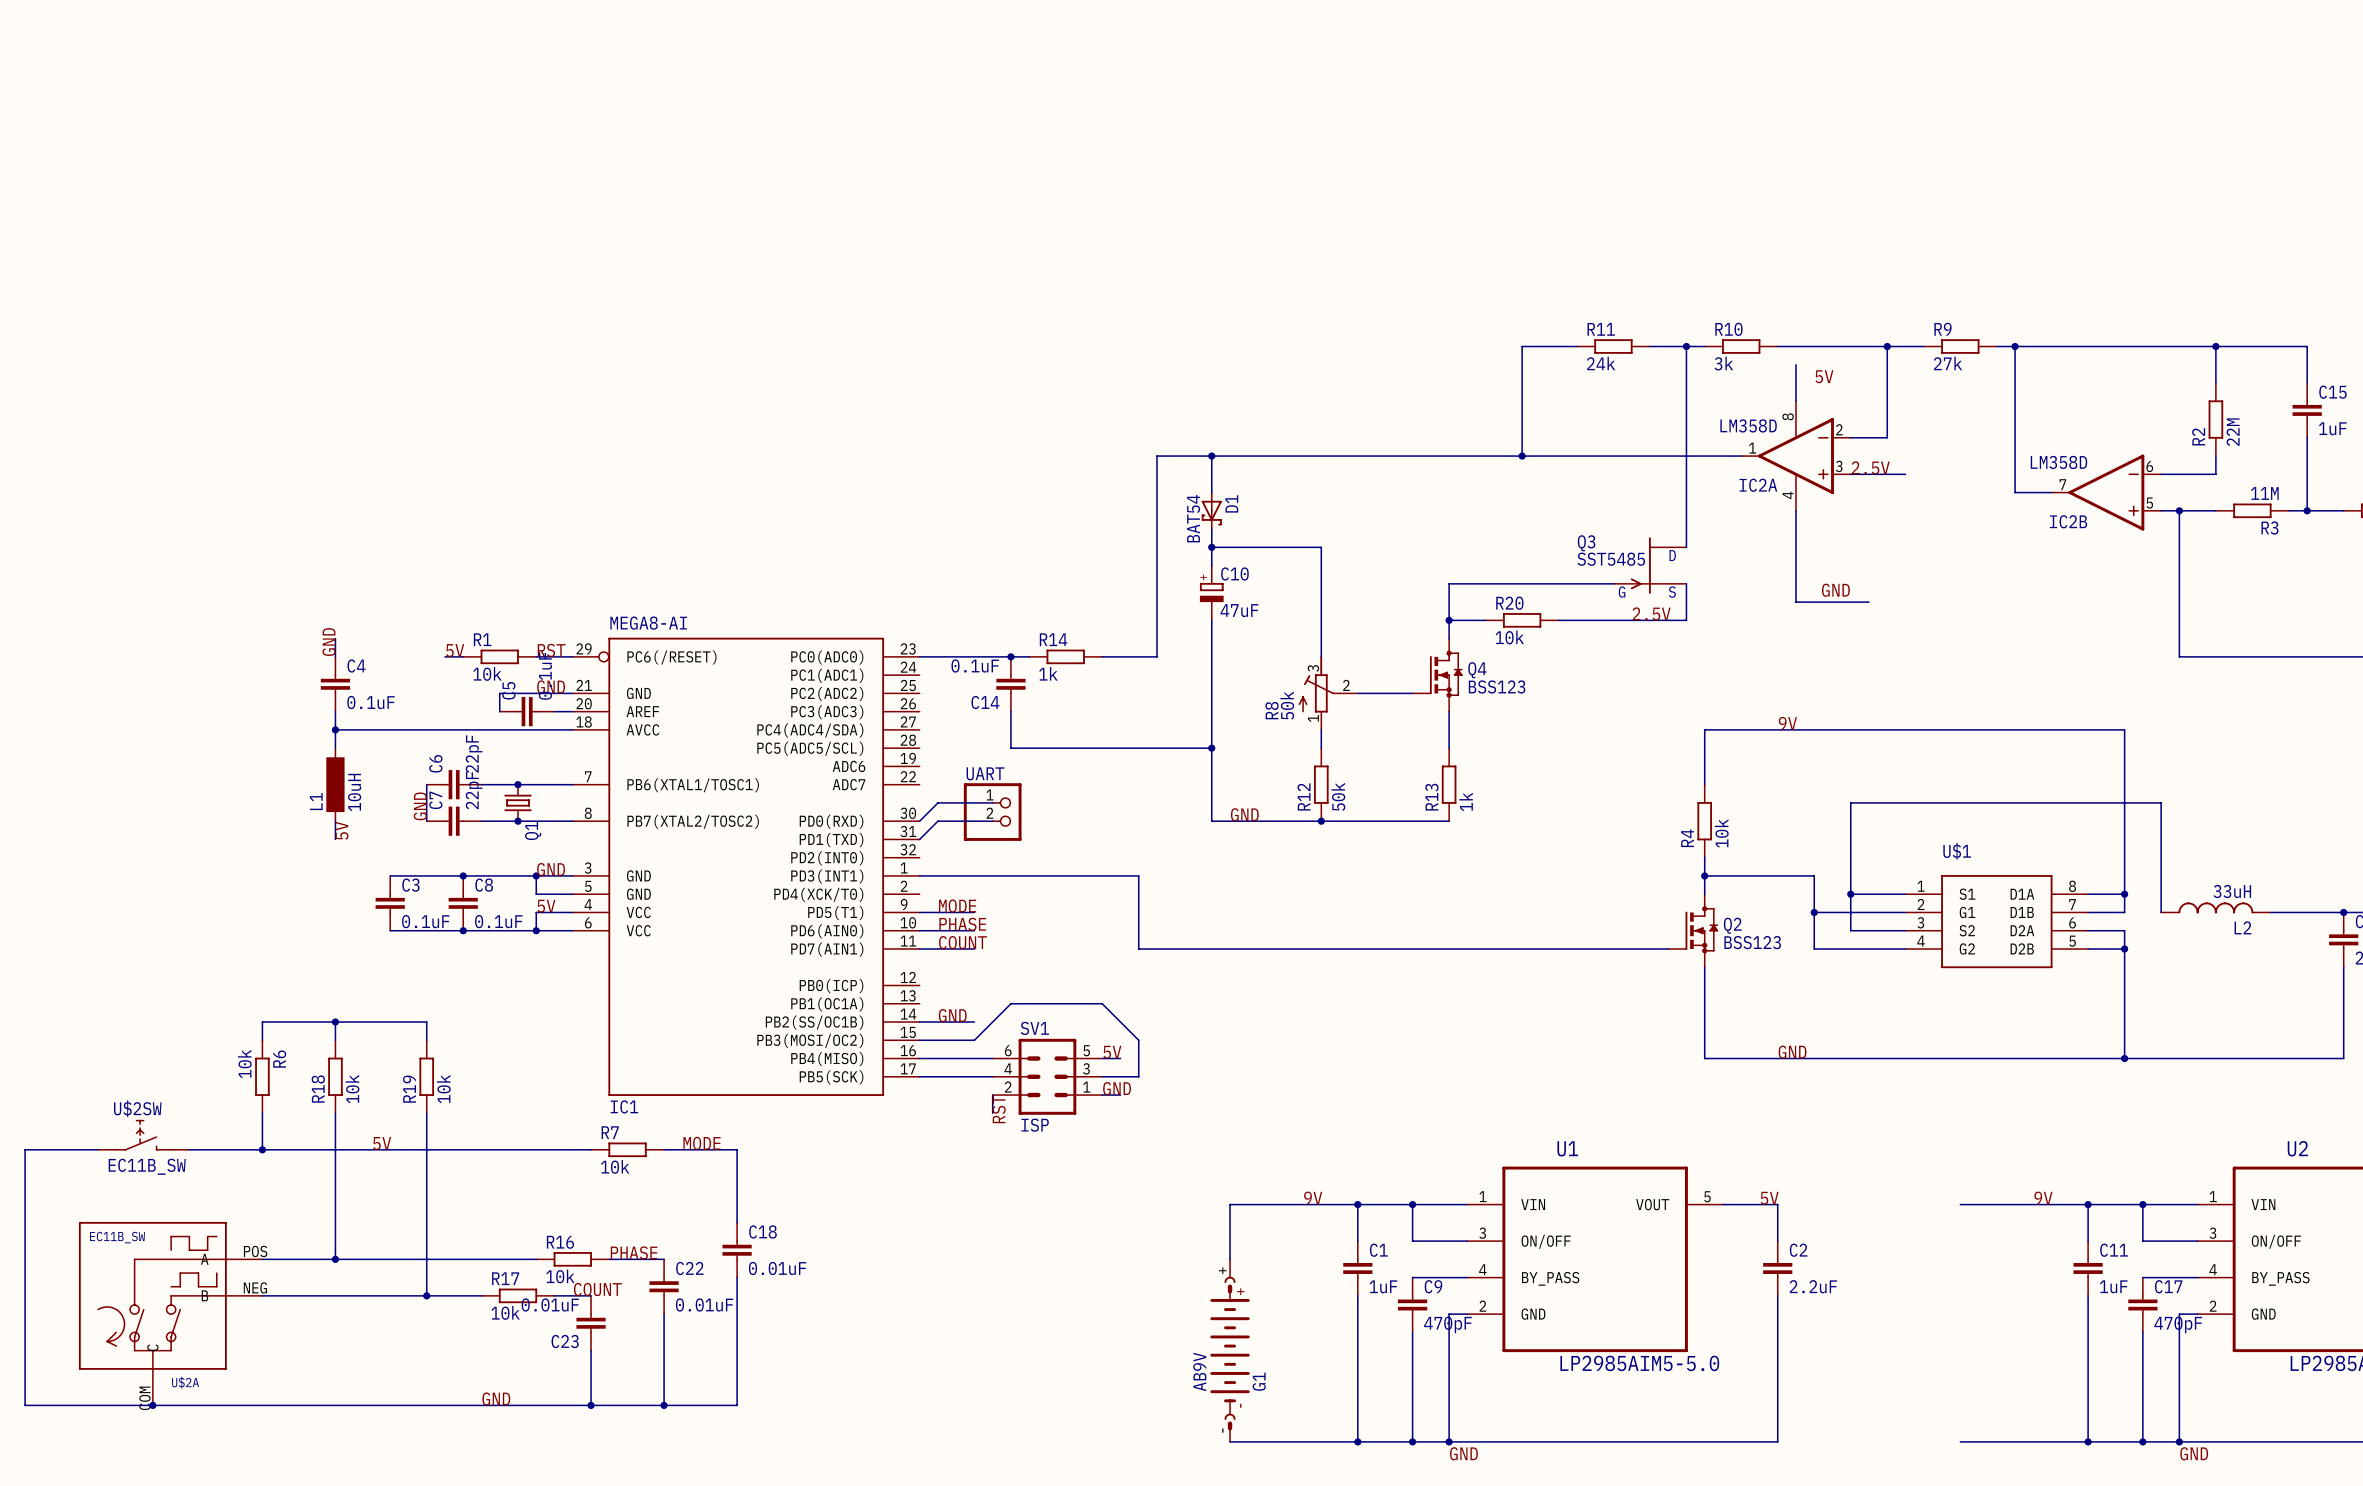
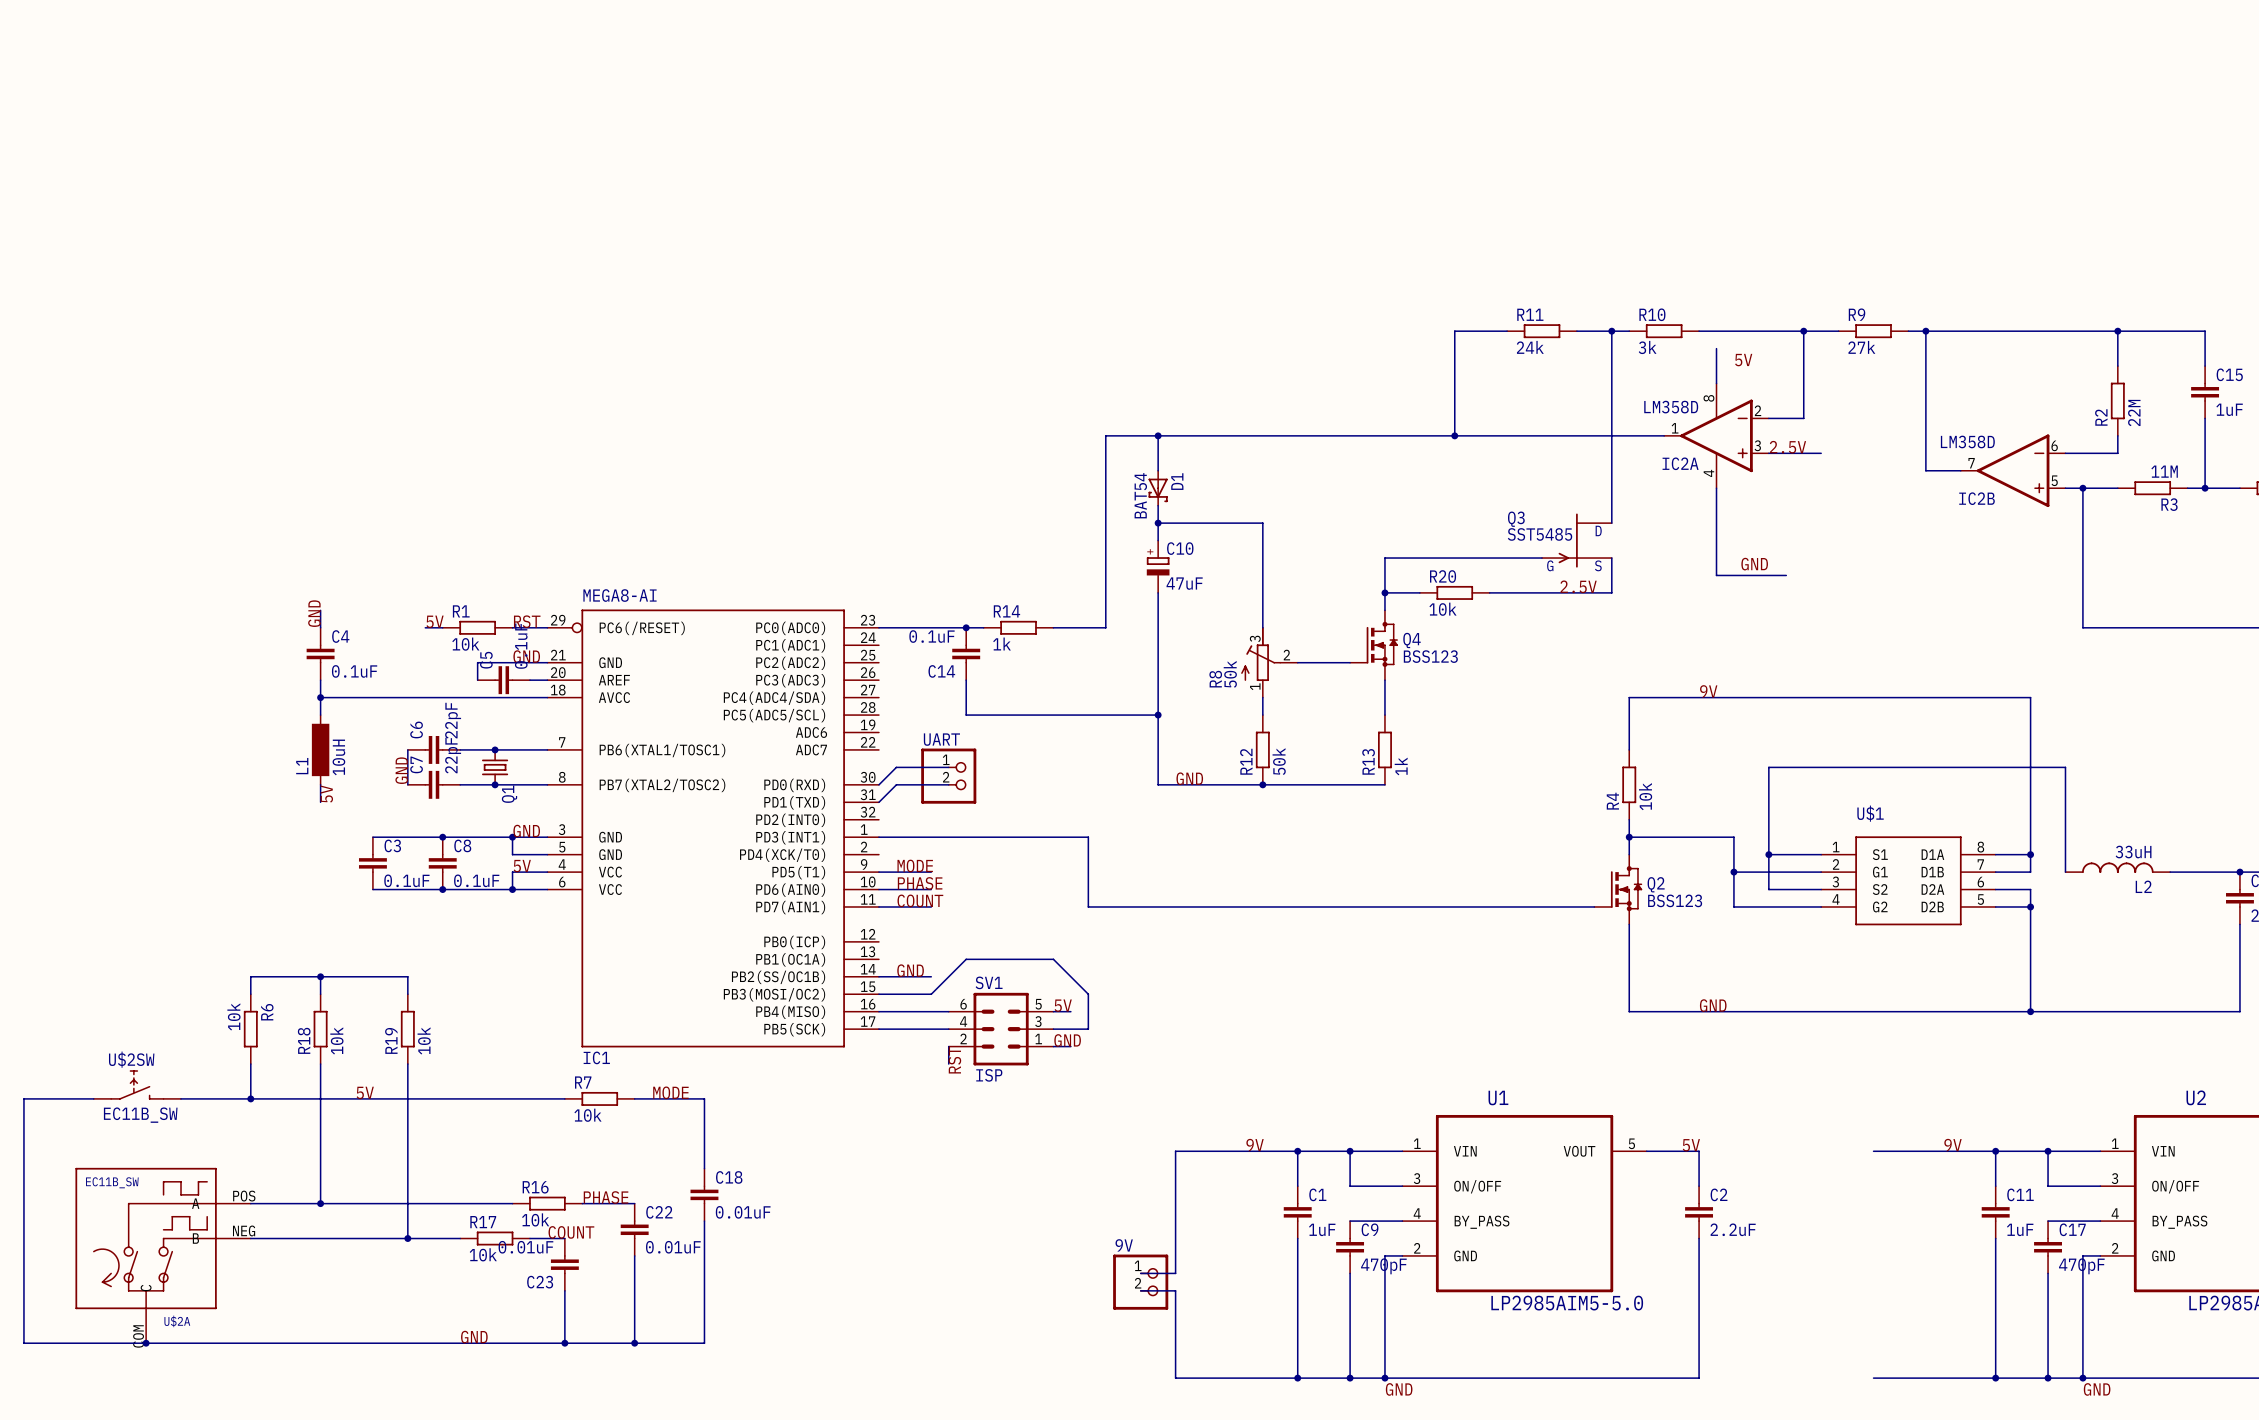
9V: none -> (1140, 1282)
wire: none -> (1140, 1290) (1175, 1290) (1175, 1378)
G1: AB9V (1230, 1350) -> none

